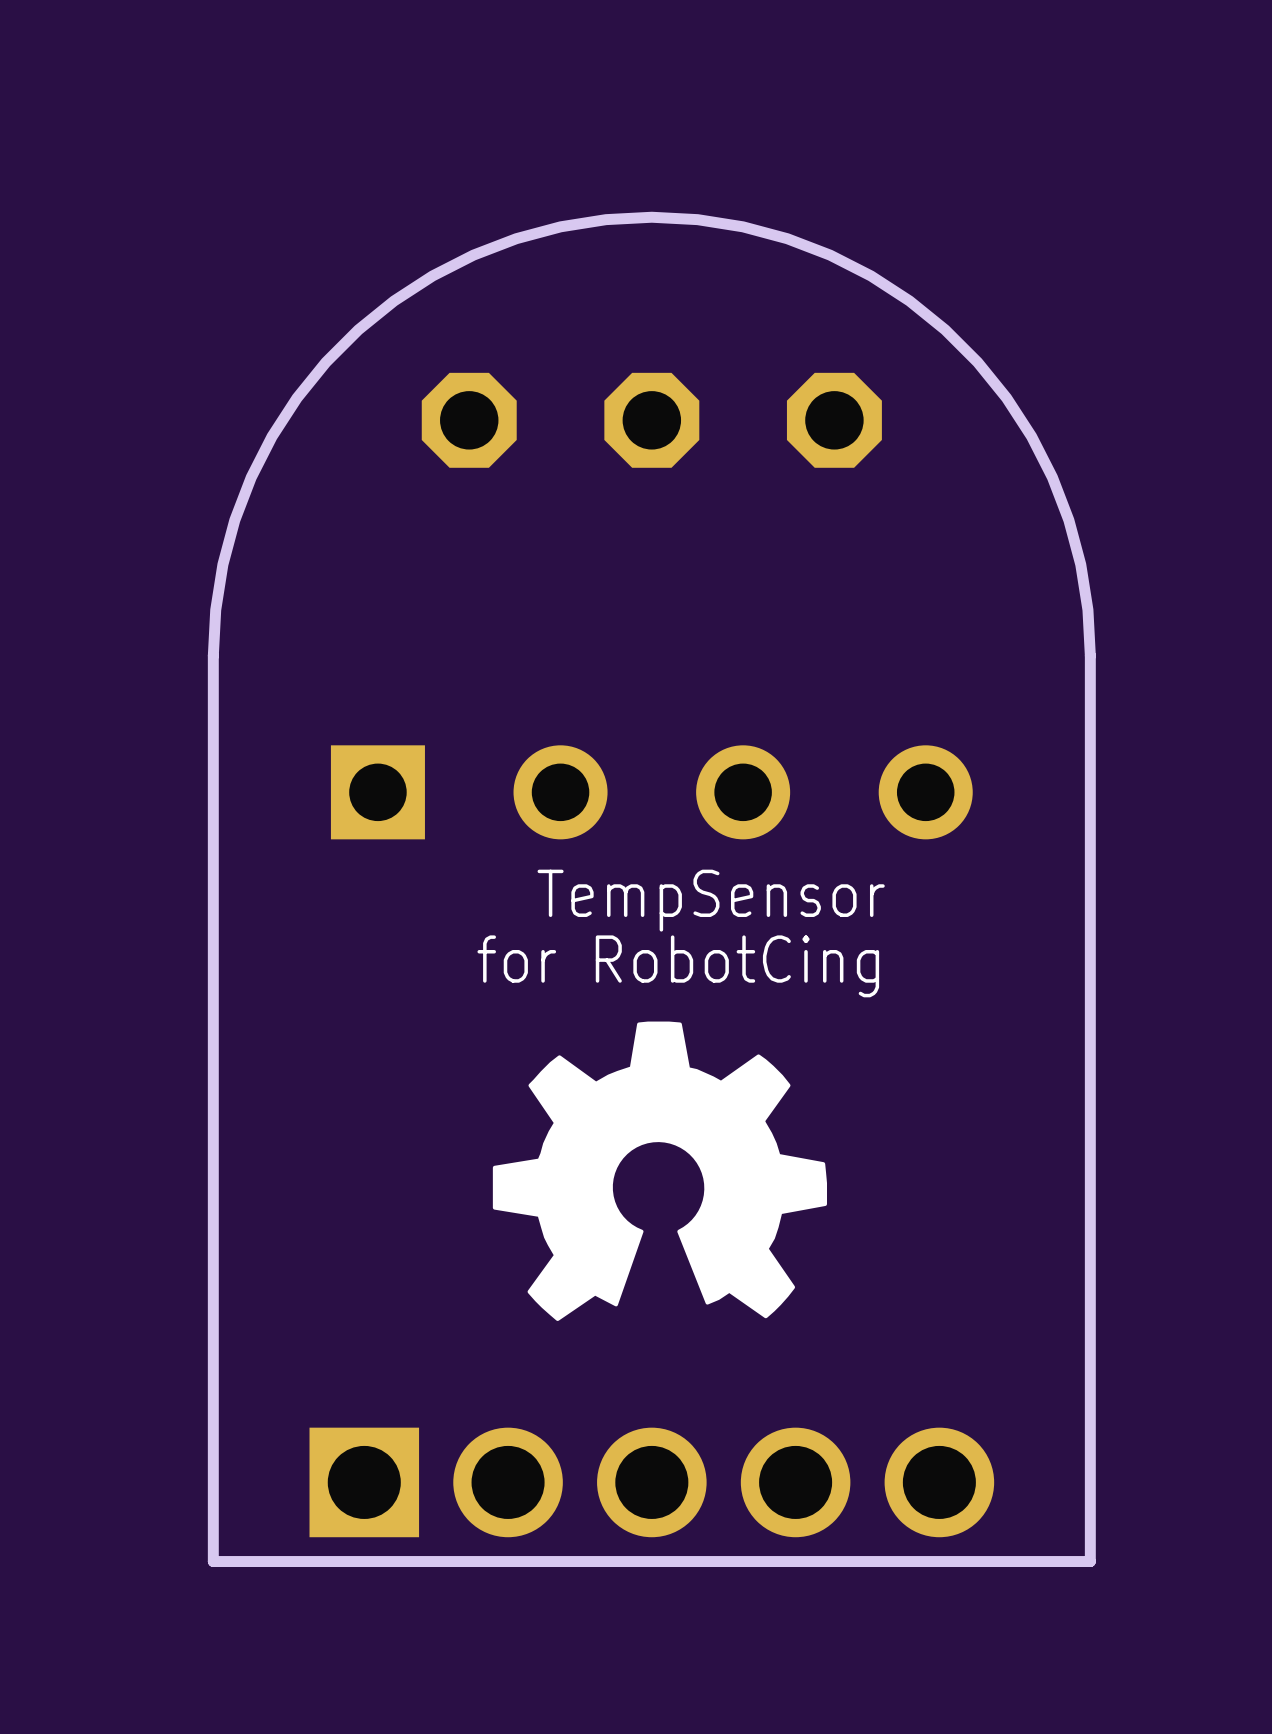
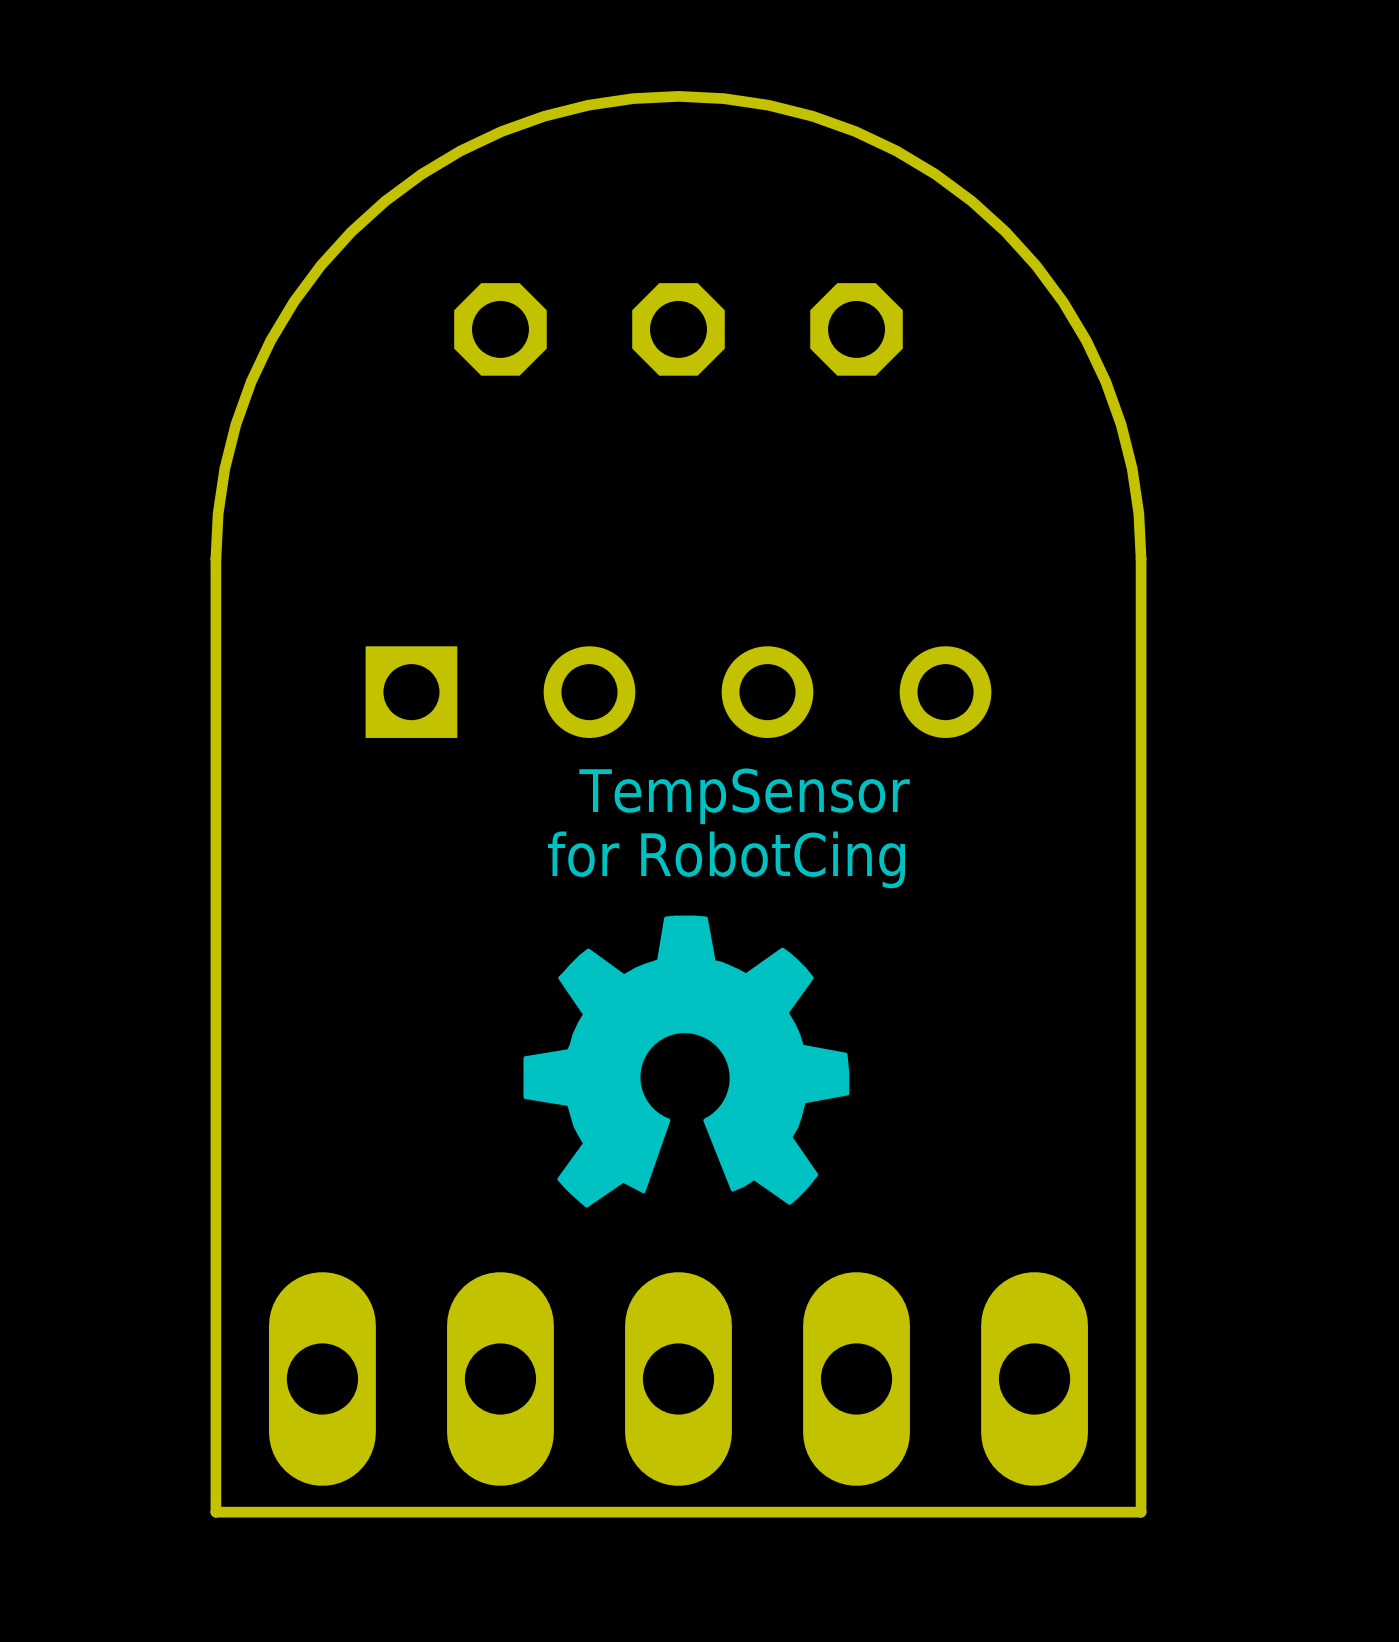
board edge: (1090, 655) (1090, 1561) (213, 1561) (213, 655) (215, 609) (222, 564) (234, 520) (251, 477) (272, 436) (297, 398) (325, 362) (358, 329) (394, 300) (432, 275) (473, 255) (516, 238) (560, 226) (606, 219) (651, 217) (697, 219) (743, 226) (787, 238) (830, 255) (871, 275) (909, 300) (945, 329) (977, 362) (1006, 398) (1031, 436) (1052, 477) (1068, 520) (1080, 564) (1087, 609) (1090, 655) -> (1141, 558) (1141, 1512) (215, 1512) (215, 558) (218, 513) (224, 468) (235, 424) (251, 381) (270, 340) (293, 301) (320, 265) (351, 231) (385, 201) (421, 174) (460, 150) (501, 131) (544, 116) (588, 105) (633, 98) (678, 96) (723, 98) (768, 105) (812, 116) (855, 131) (896, 150) (935, 174) (971, 201) (1005, 231) (1036, 265) (1063, 301) (1086, 340) (1105, 381) (1121, 424) (1132, 468) (1138, 513) (1141, 558)
part footprint: [309, 1427, 995, 1538] -> [269, 1272, 1088, 1486]

